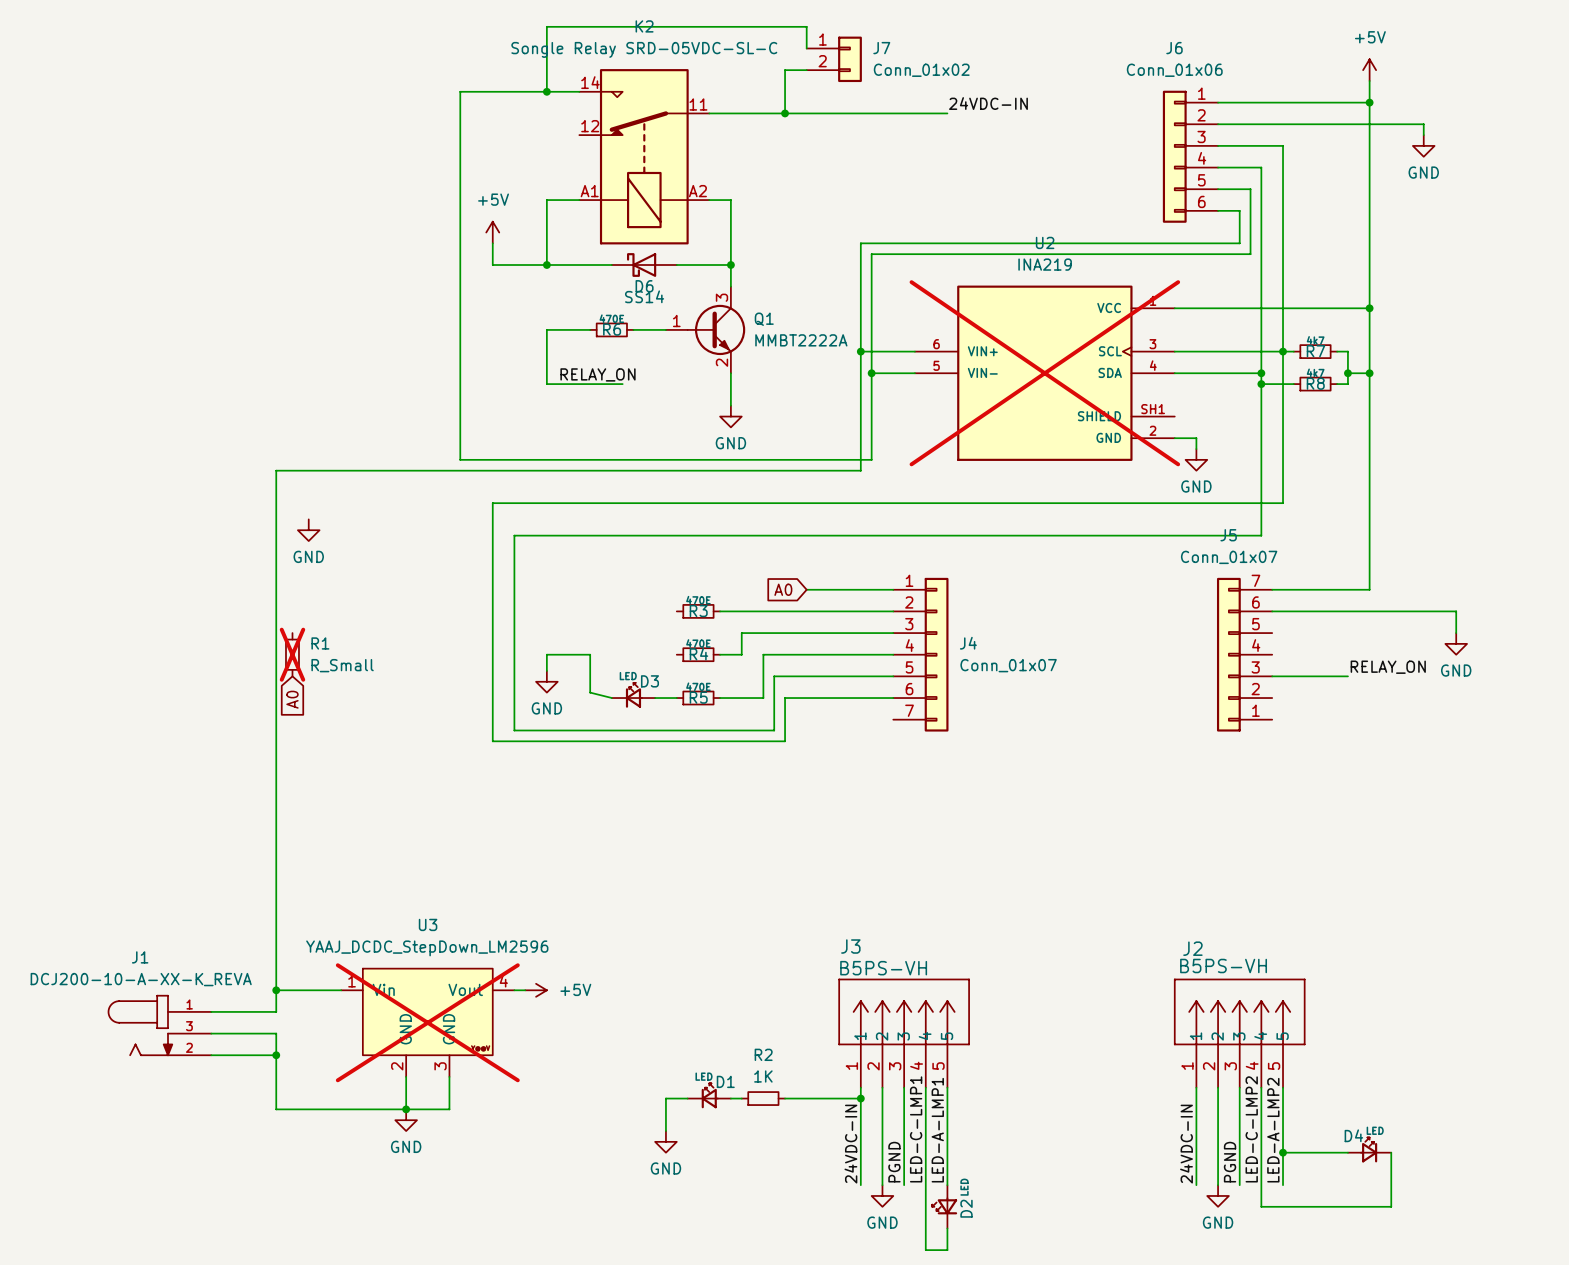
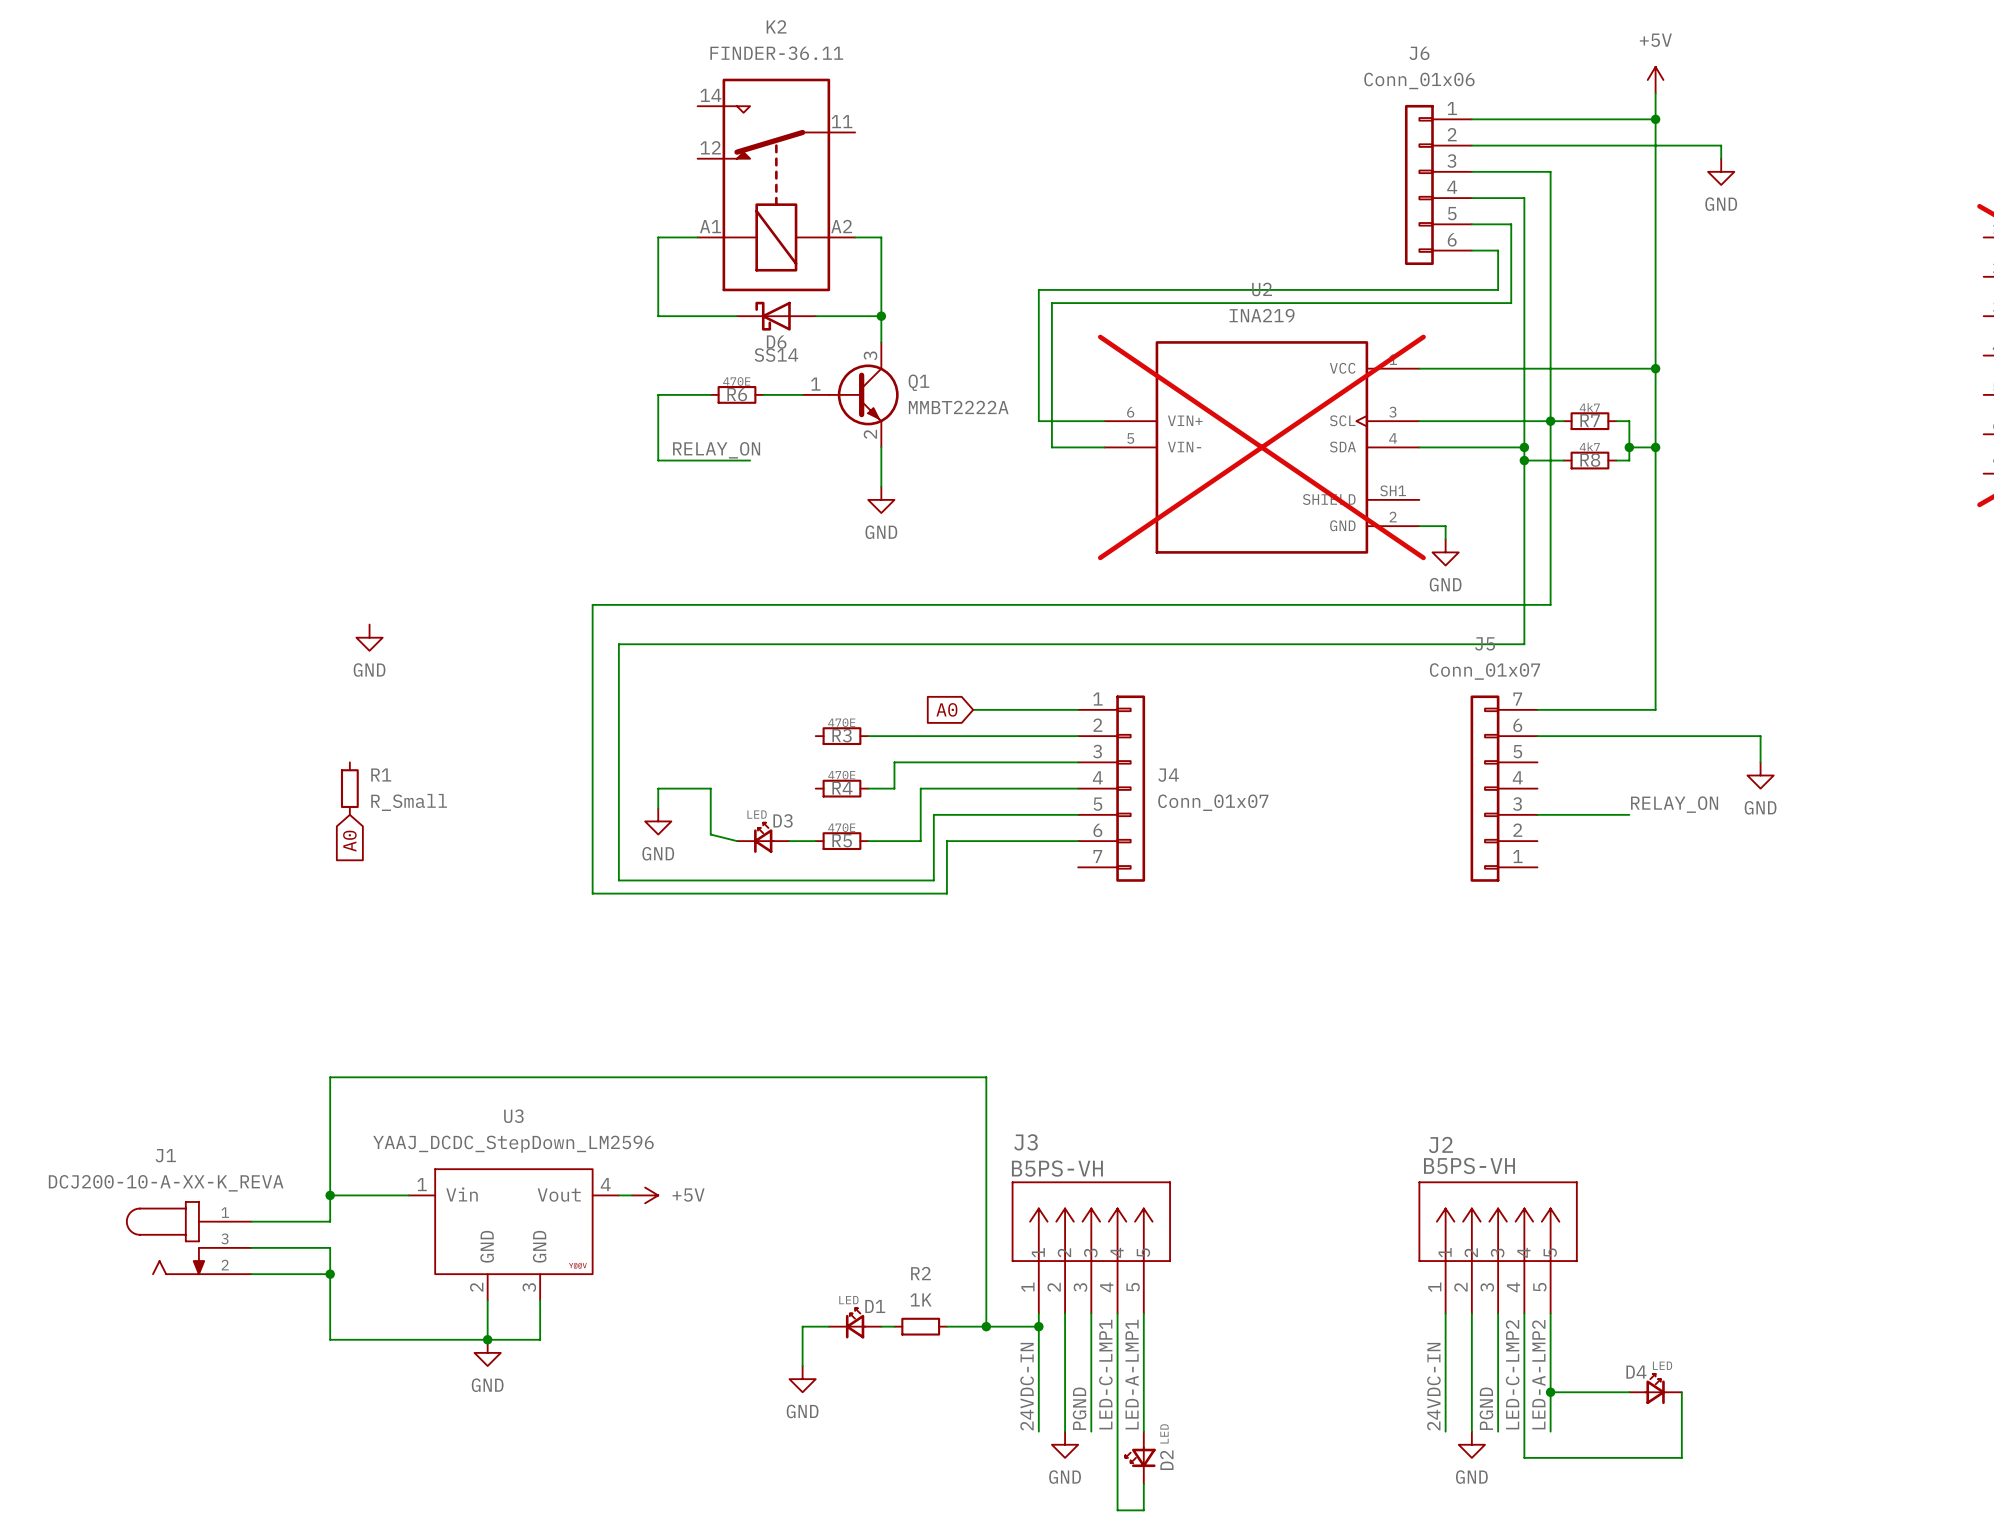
wire: (806, 48) (806, 26) (546, 26) (546, 91) -> none
K2 value: Songle Relay SRD-05VDC-SL-C (644, 49) -> FINDER-36.11 (776, 53)
J7: Conn_01x02 (834, 59) -> none
wire: (806, 70) (785, 70) (785, 113) -> none
junction: (546, 91) -> none
wire: (579, 91) (460, 91) (460, 459) (871, 459) (871, 373) -> none
label: 24VDC-IN (988, 103) -> none
wire: (709, 113) (947, 113) -> none
junction: (785, 113) -> none
power symbol: +5V (492, 232) -> none
wire: (492, 243) (492, 265) (546, 265) -> none
junction: (546, 265) -> none
wire: (860, 351) (860, 470) (276, 470) (276, 892) -> (986, 1326) (986, 1077) (330, 1077)
junction: (860, 351) -> none
junction: (871, 373) -> none
R1 do-not-place cross: (292, 654) -> none
U3 do-not-place cross: (427, 1022) -> none
junction: none -> (986, 1326)

